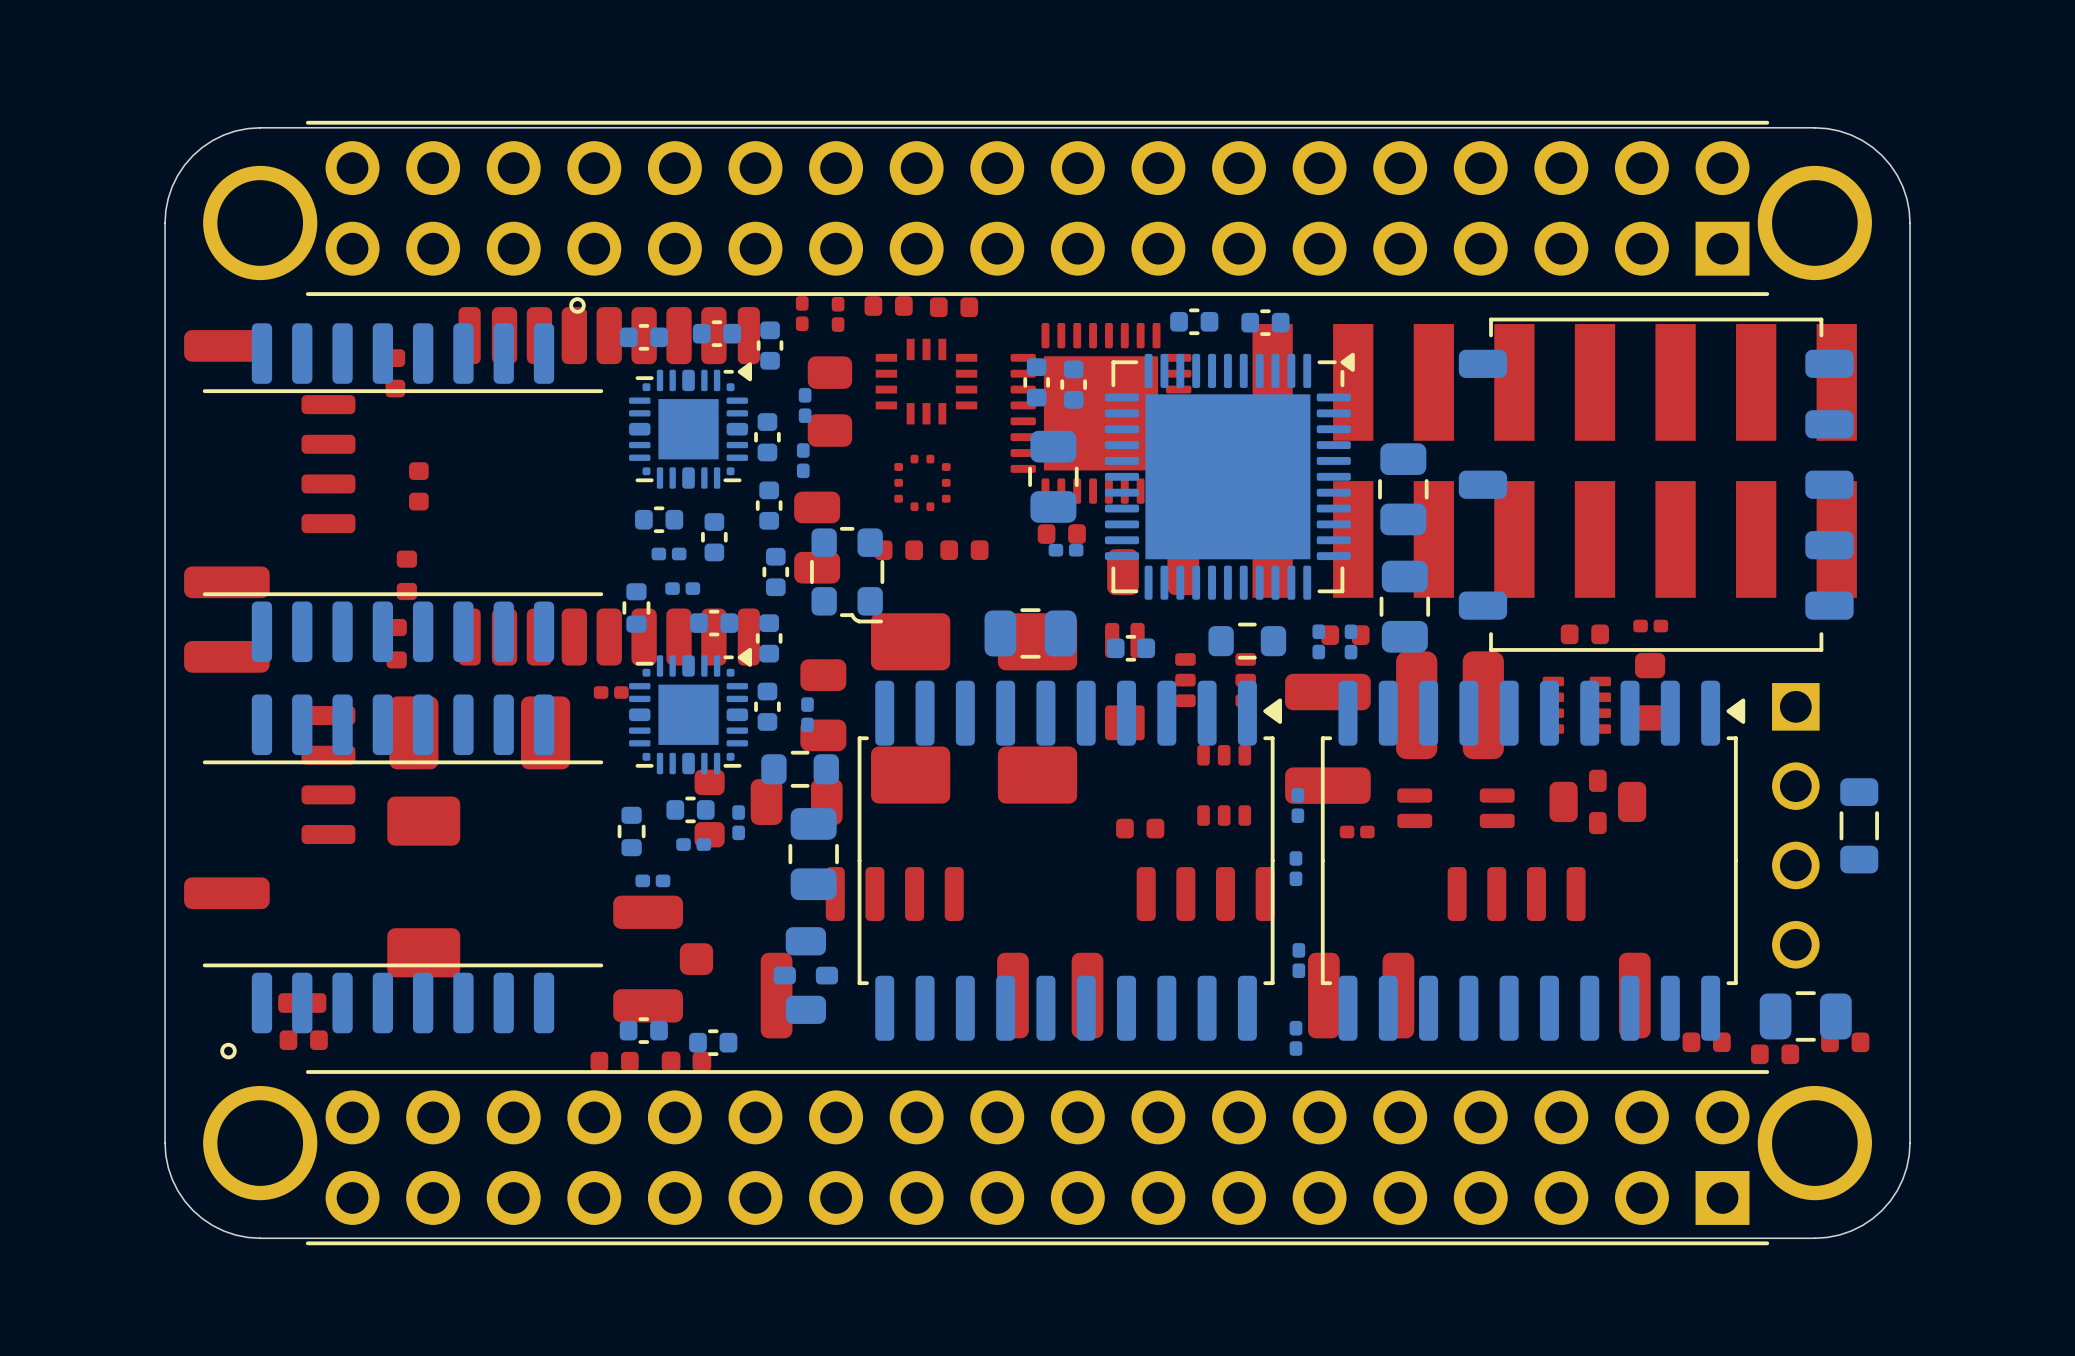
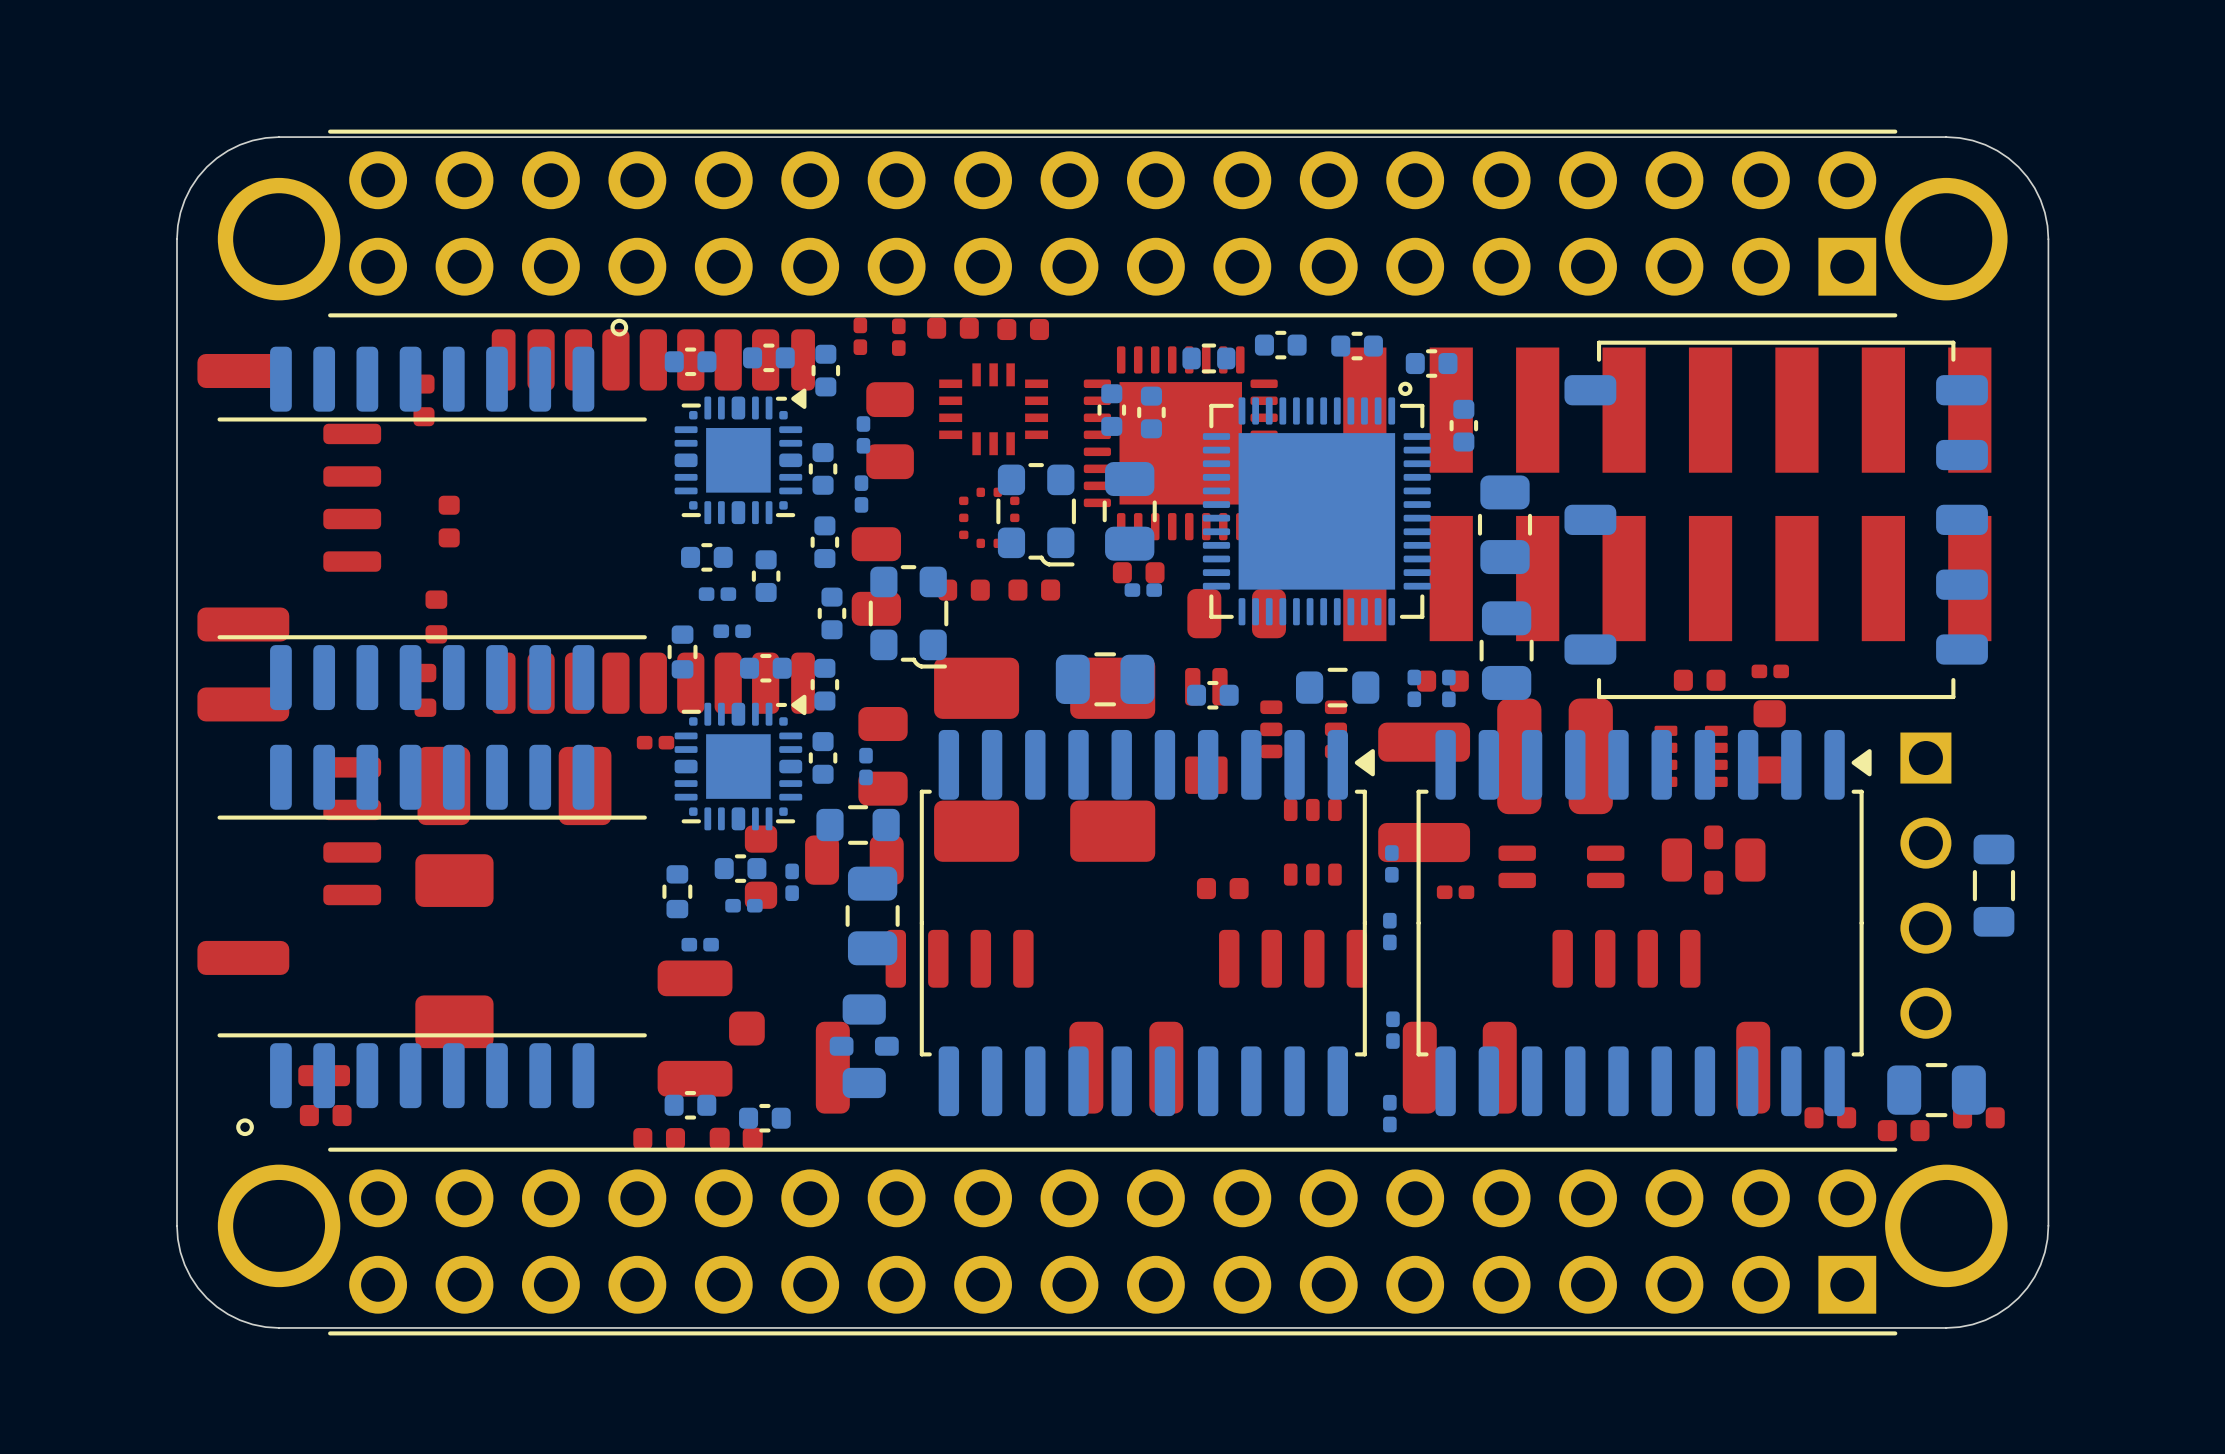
part: none -> (1208, 358)
part: none -> (1431, 363)
part footprint: [1104, 352, 1355, 600] -> [1202, 381, 1431, 626]
part: none -> (1463, 425)
part: none -> (1036, 514)

